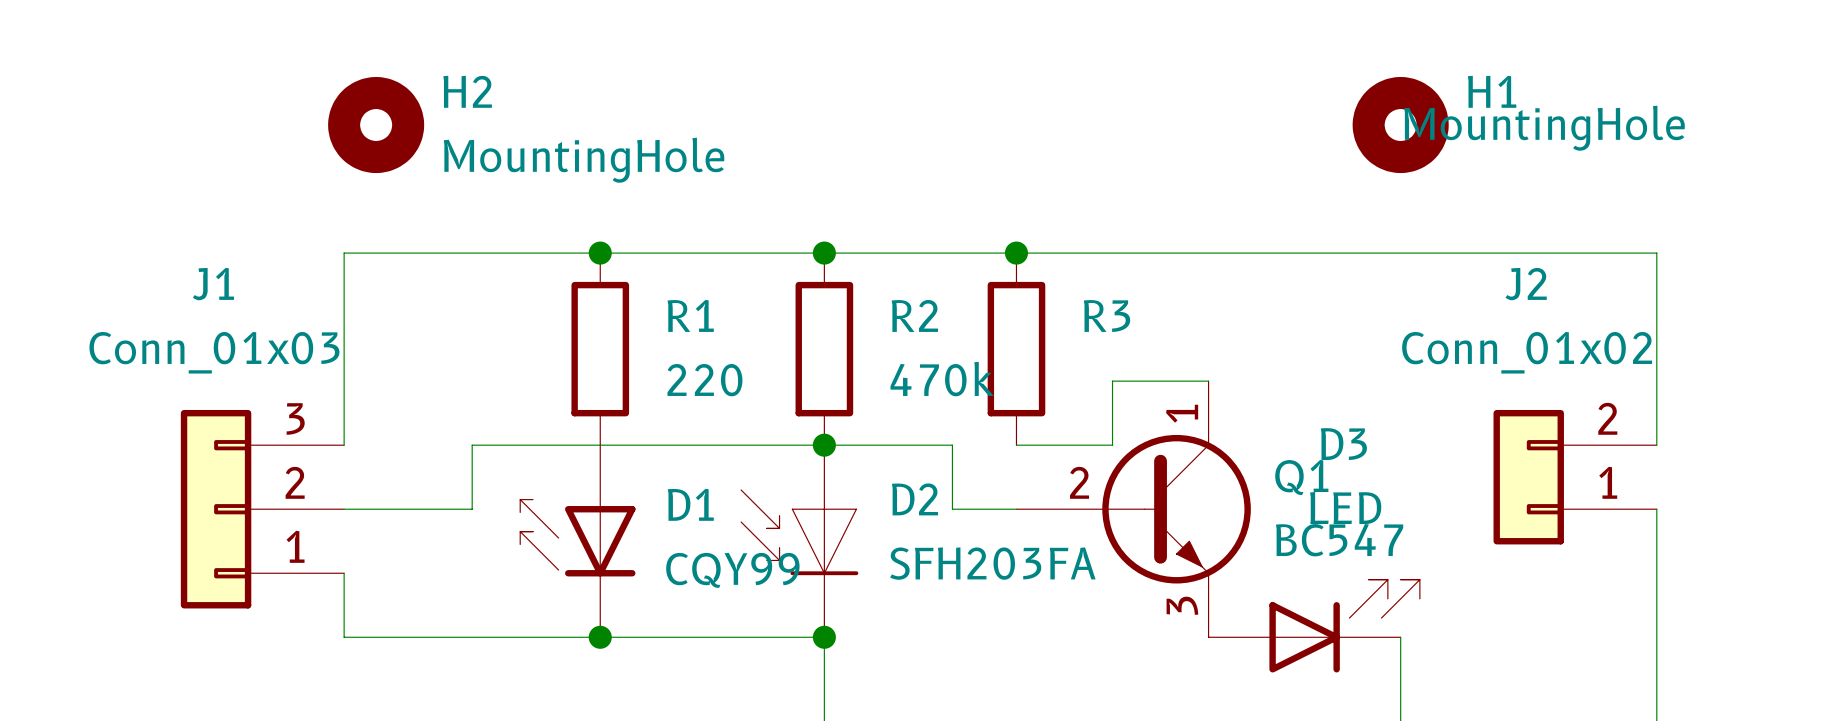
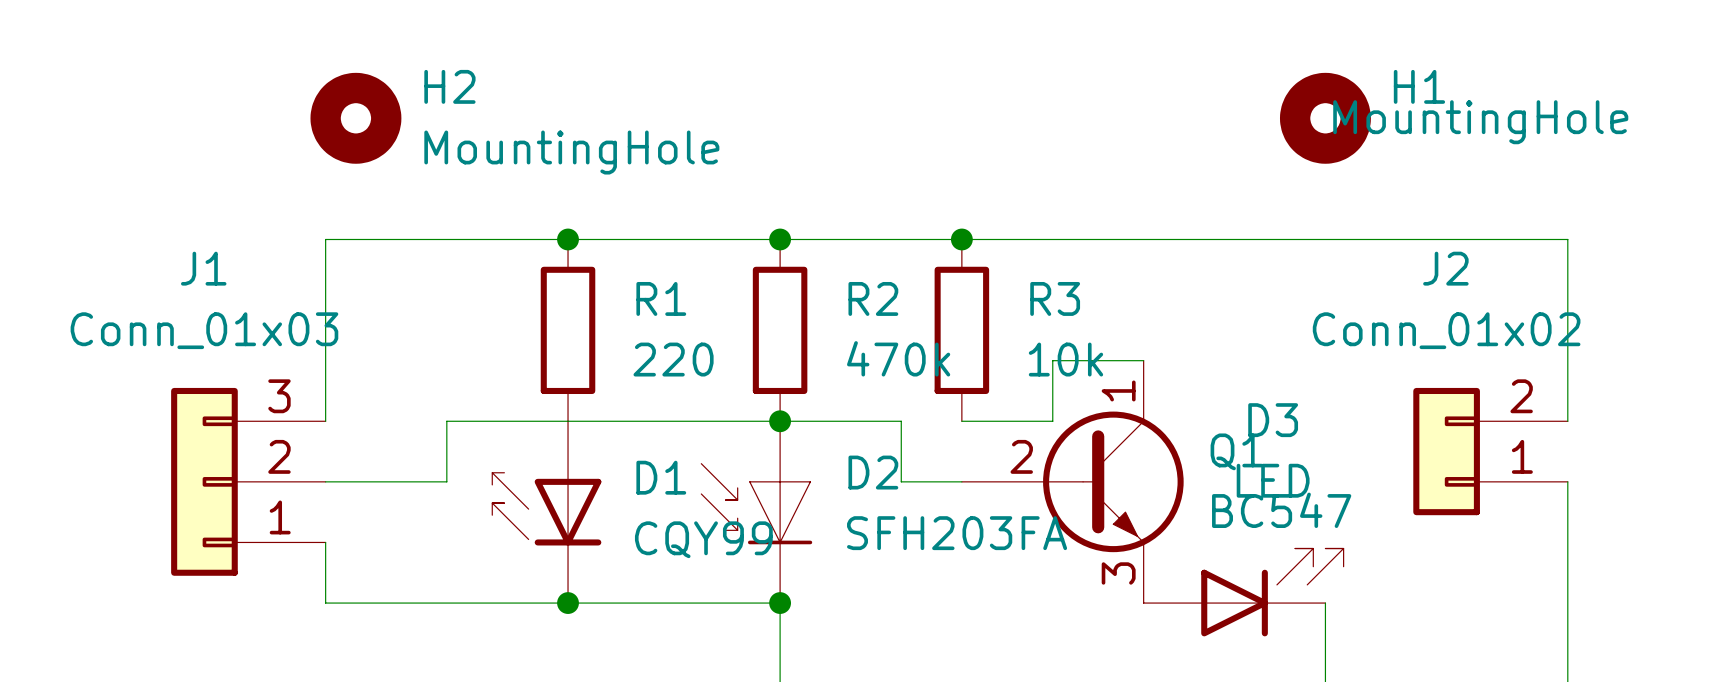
R3 value: none -> 10k (1065, 359)

